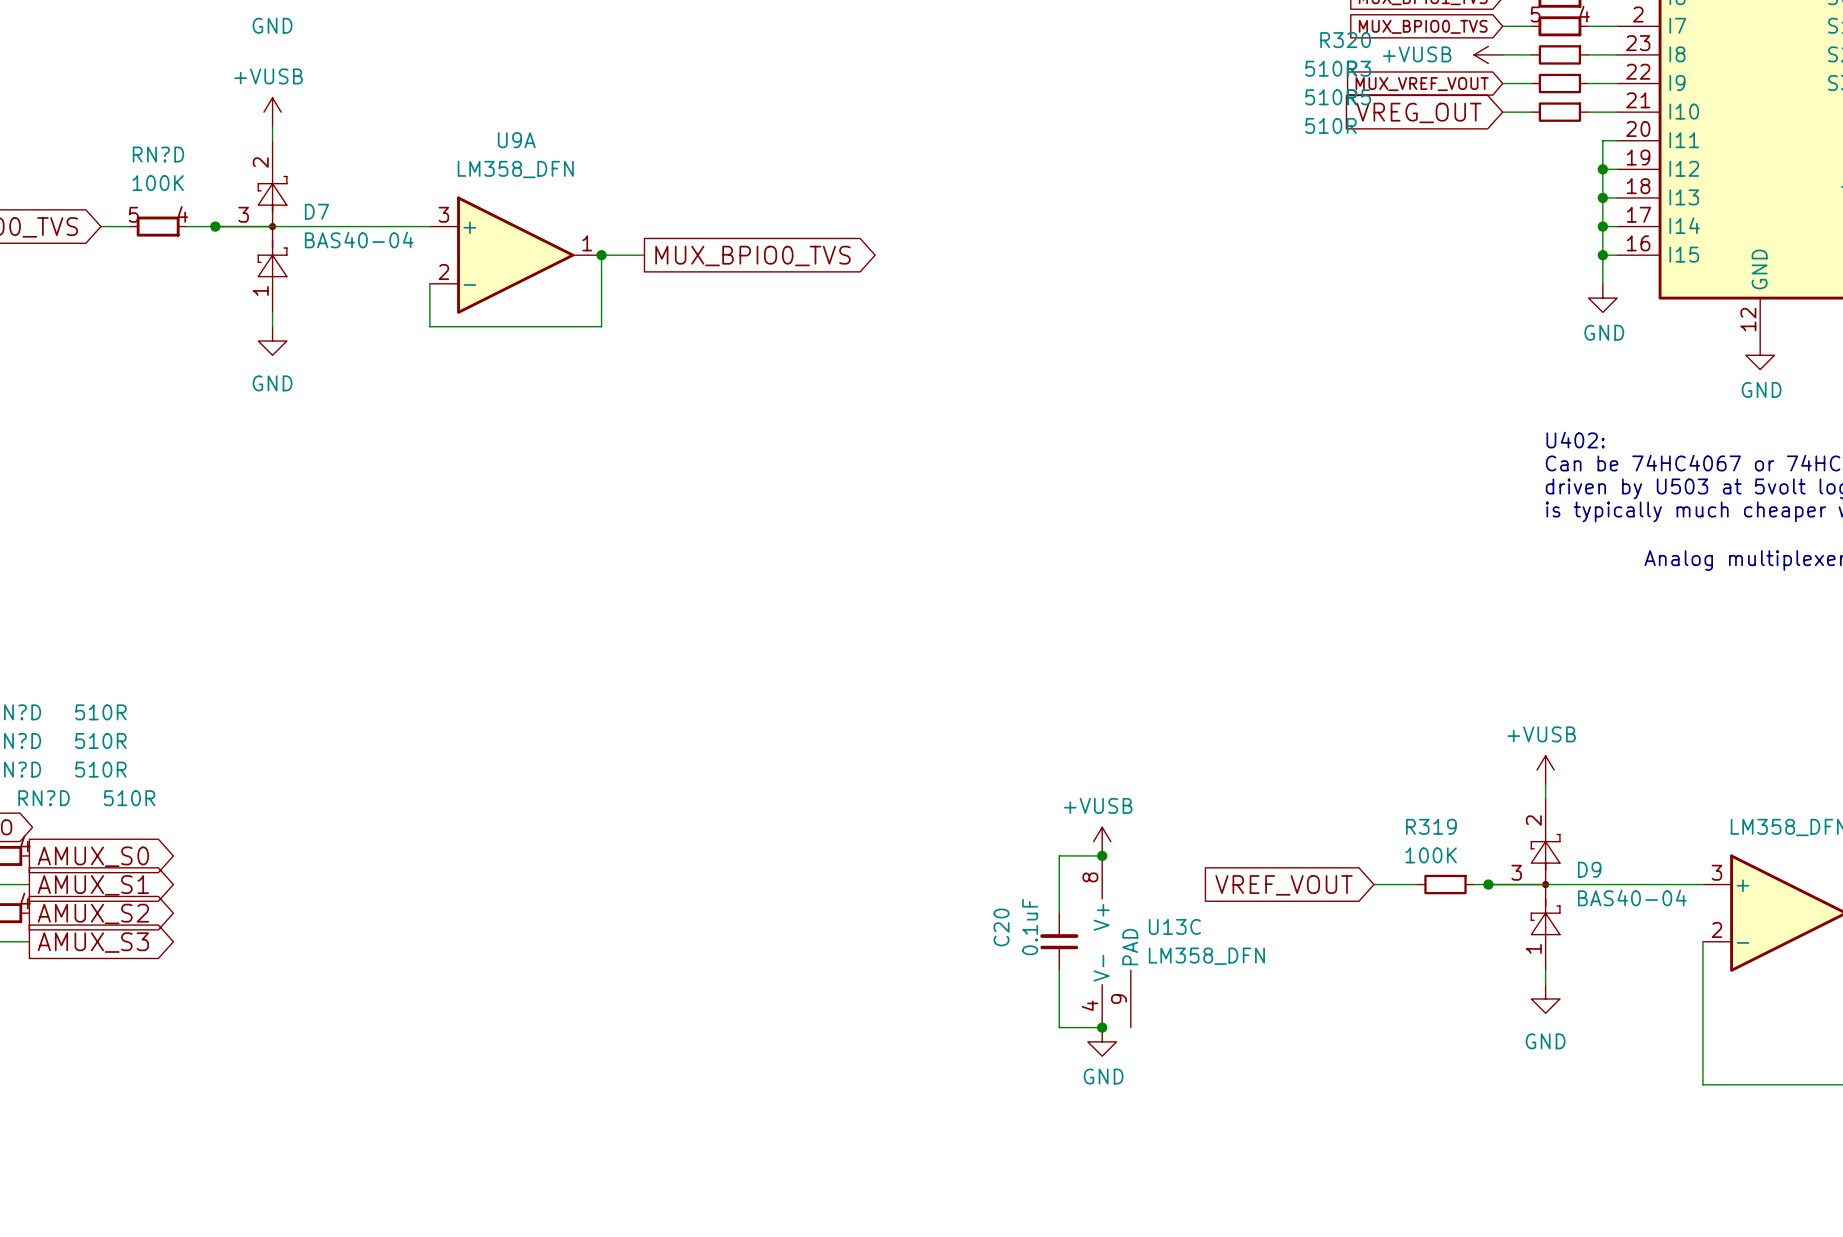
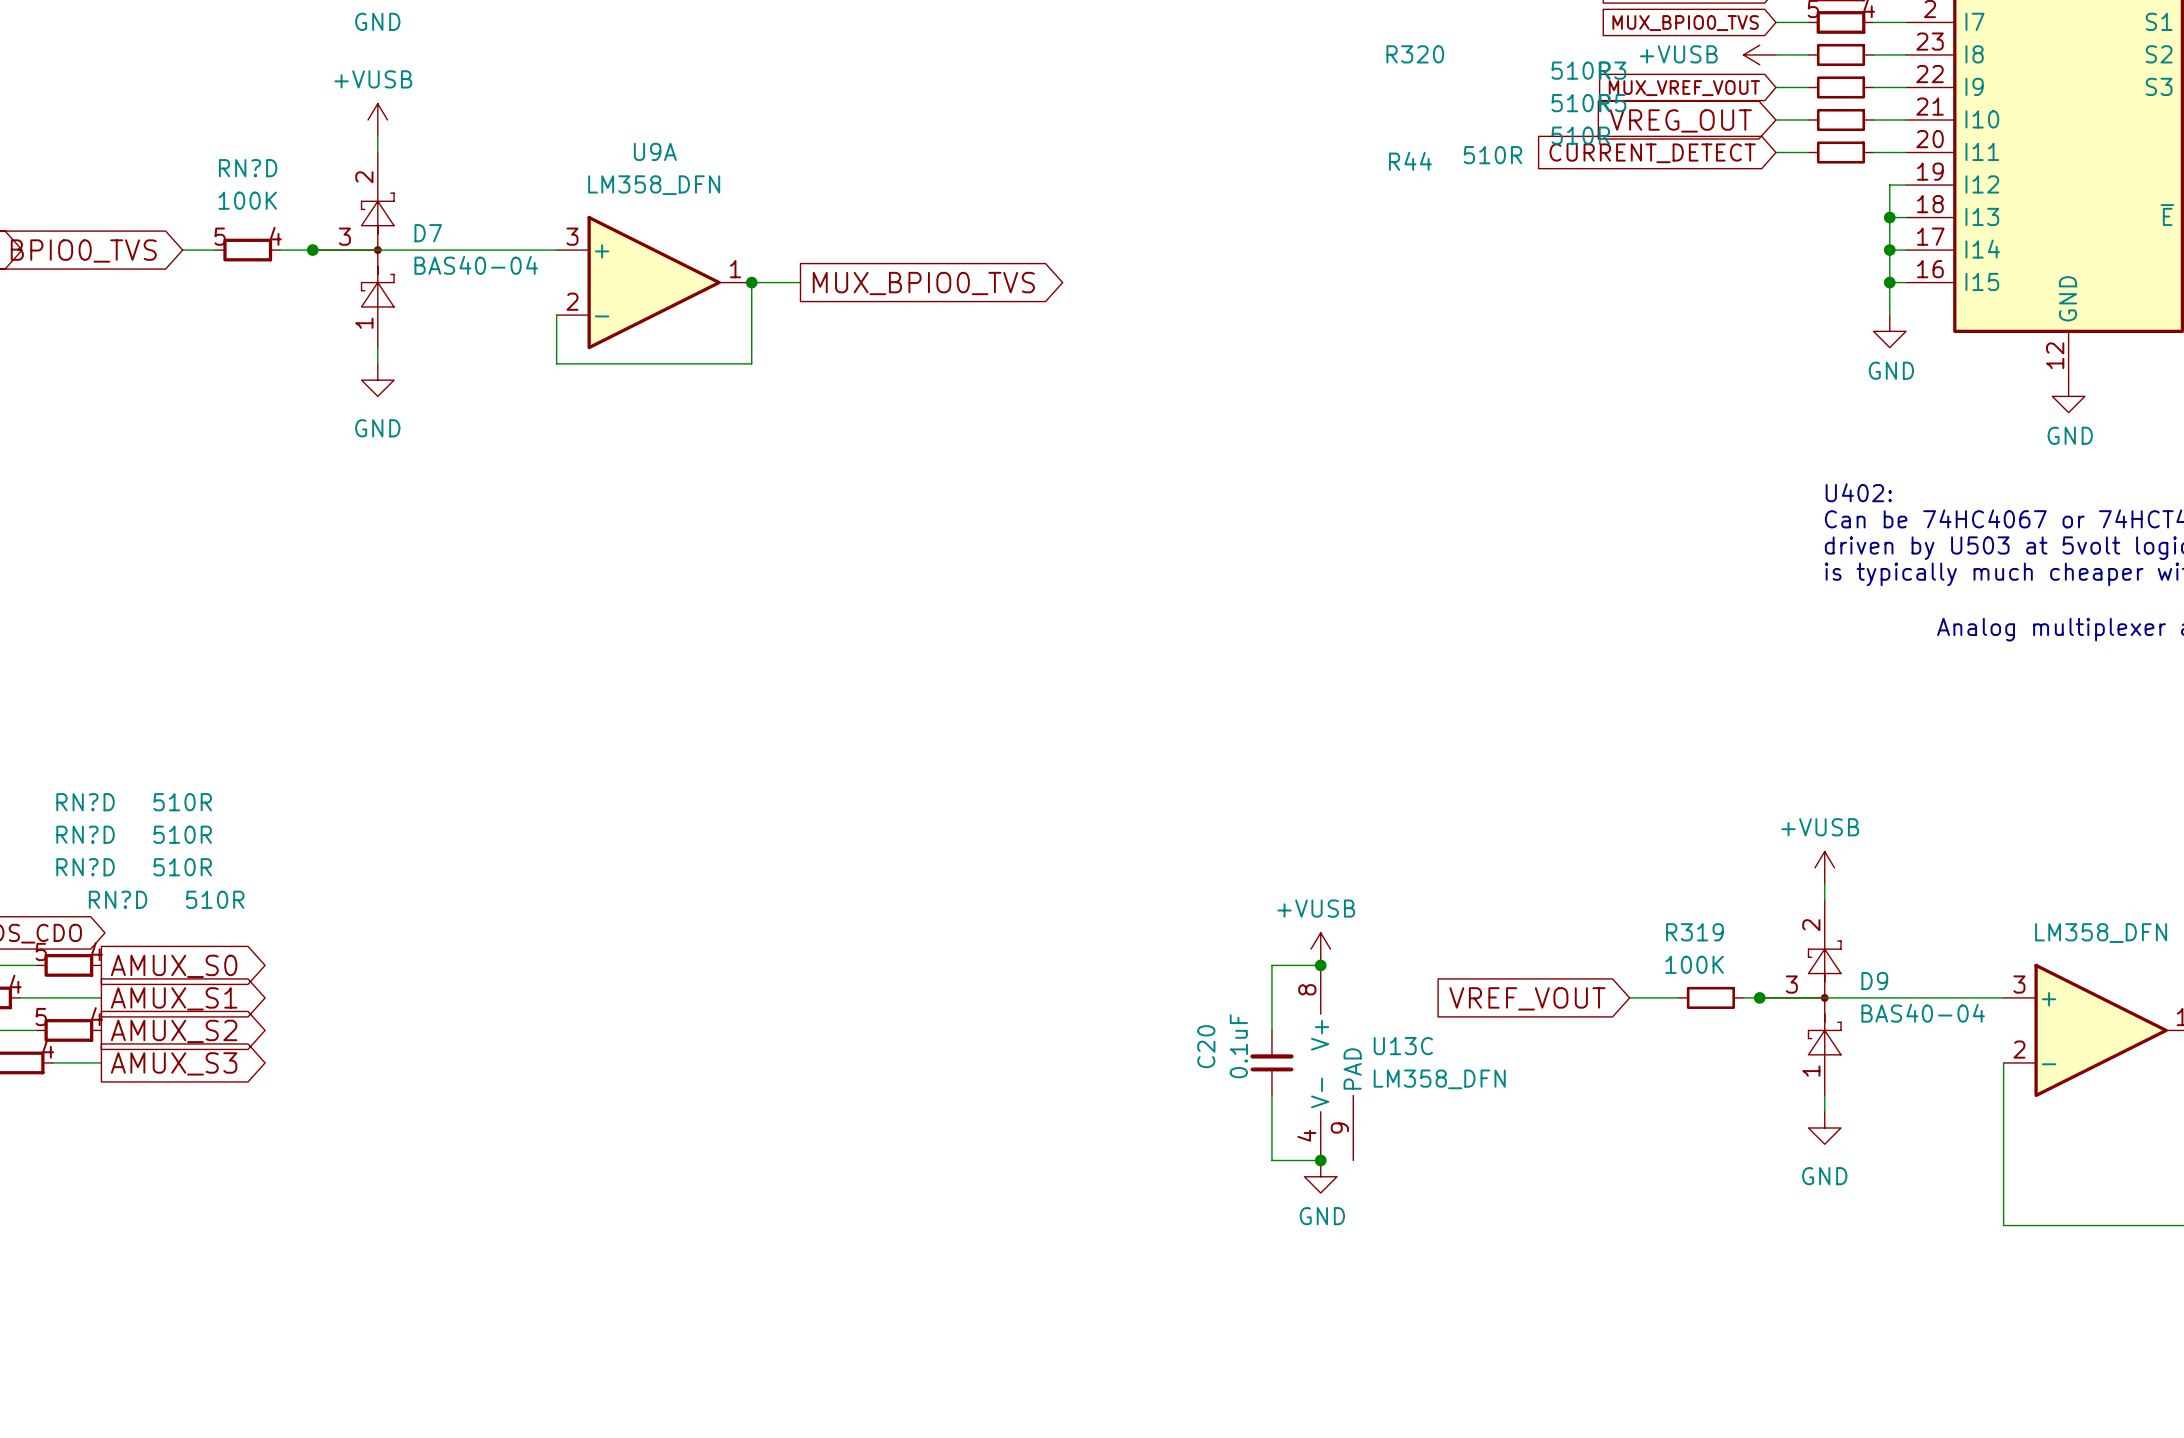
R320 name position: R320 (1345, 40) -> R320 (1415, 54)
wire: none -> (1775, 152) (1808, 152)
R44: none -> 510R (1841, 152)
wire: (1602, 140) (1602, 169) -> (1889, 152) (1873, 152)
global label: none -> CURRENT_DETECT (1652, 153)
junction: (1602, 169) -> none

